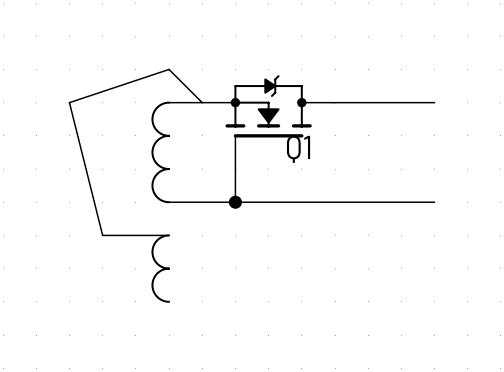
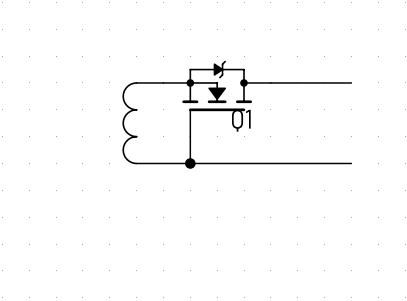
wire: (202, 102) (169, 69) (69, 102) (102, 235) (169, 235) -> none
line: (169, 235) (157, 240) (152, 252) (157, 263) (169, 268) (160, 270) (155, 275) (152, 283) (153, 289) (158, 298) (169, 301) -> none

